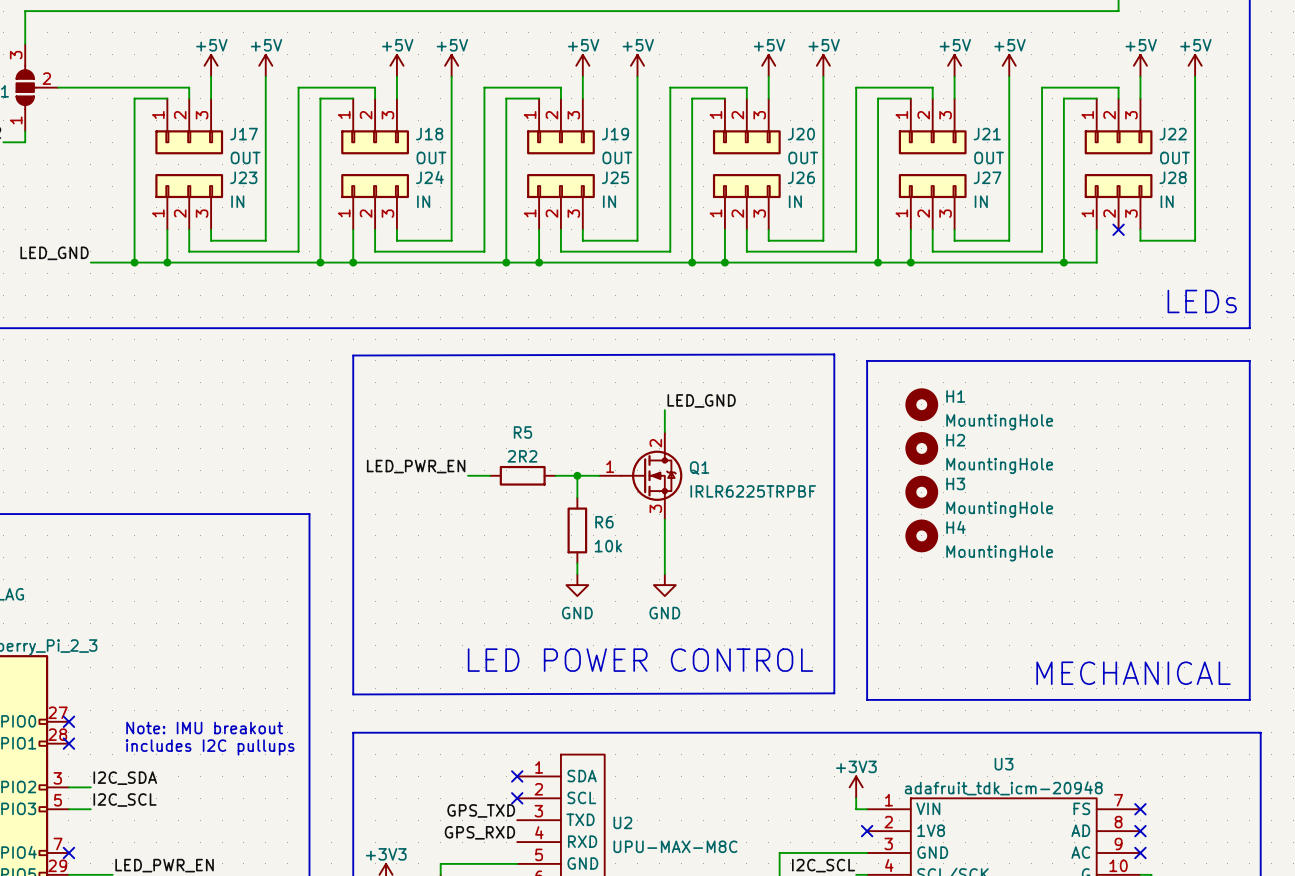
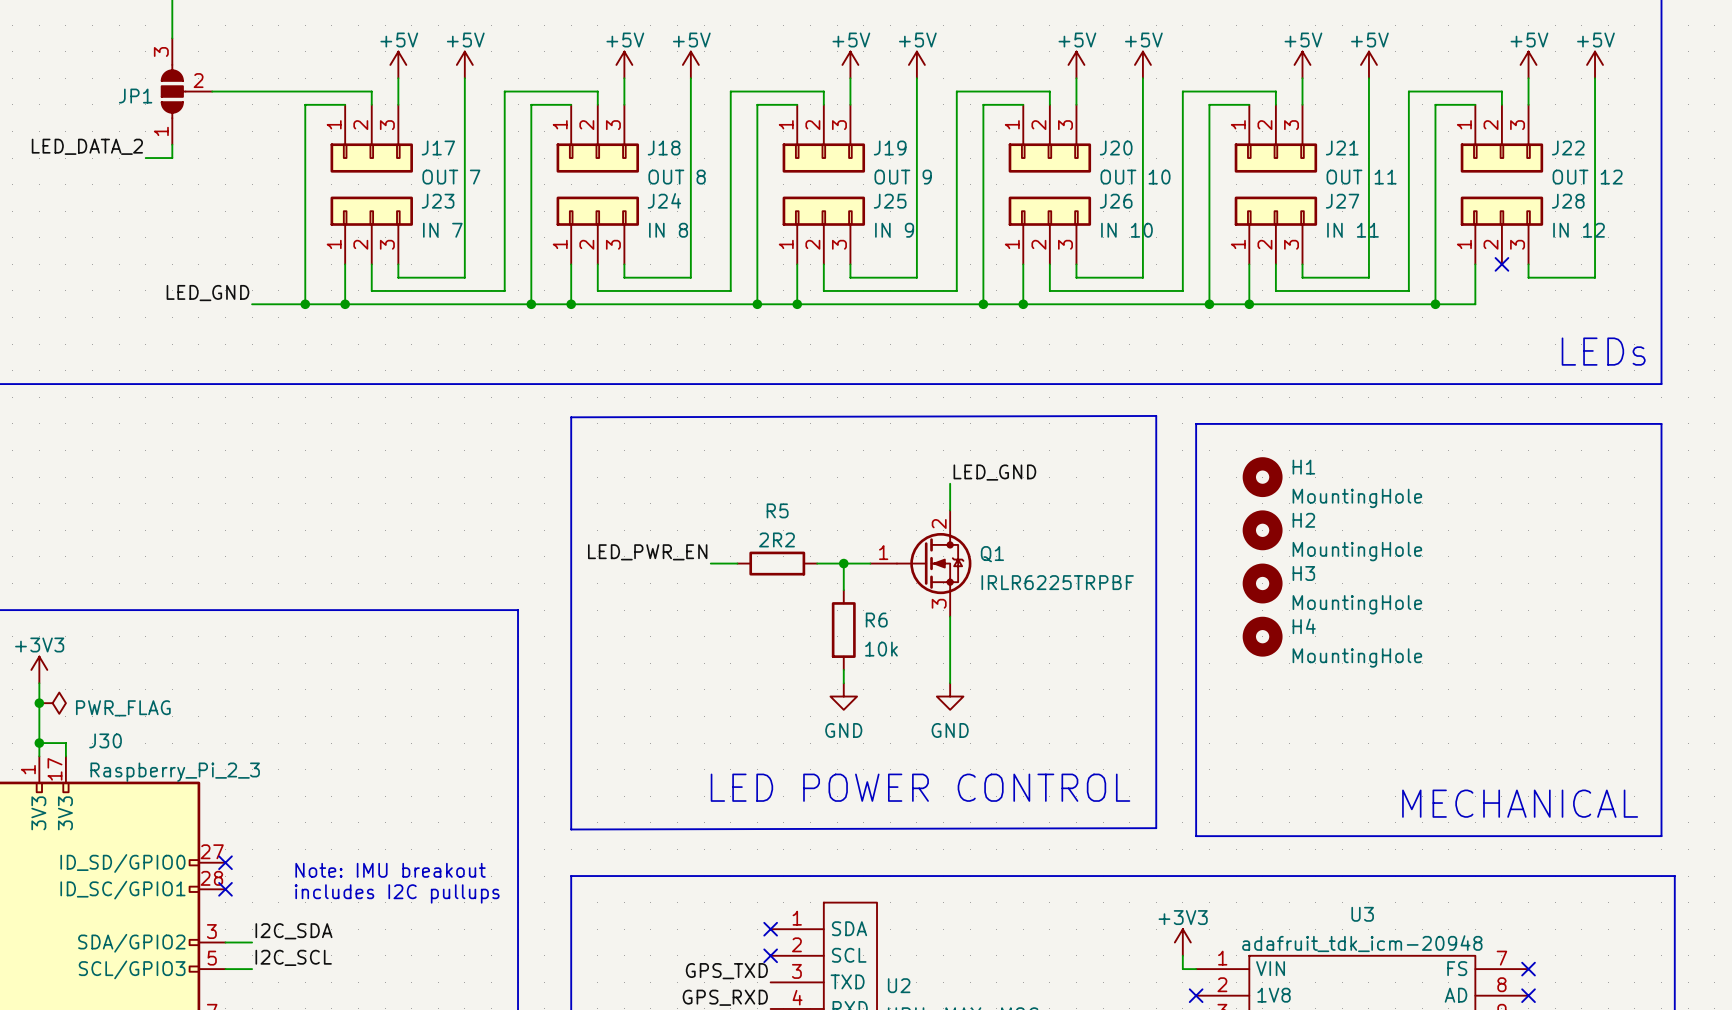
J17 value: OUT (245, 157) -> OUT 7 (451, 177)
J18 value: OUT (431, 157) -> OUT 8 (677, 177)
J19 value: OUT (617, 157) -> OUT 9 (903, 177)
J20 value: OUT (803, 157) -> OUT 10 (1135, 177)
J21 value: OUT (989, 157) -> OUT 11 (1361, 177)
J22 value: OUT (1174, 157) -> OUT 12 (1587, 177)
J23 value: IN (237, 201) -> IN 7 (442, 230)
J24 value: IN (423, 201) -> IN 8 (668, 230)
J25 value: IN (609, 201) -> IN 9 (894, 230)
J26 value: IN (795, 201) -> IN 10 (1126, 230)
J27 value: IN (981, 201) -> IN 11 (1353, 230)
J28 value: IN (1167, 201) -> IN 12 (1579, 230)

